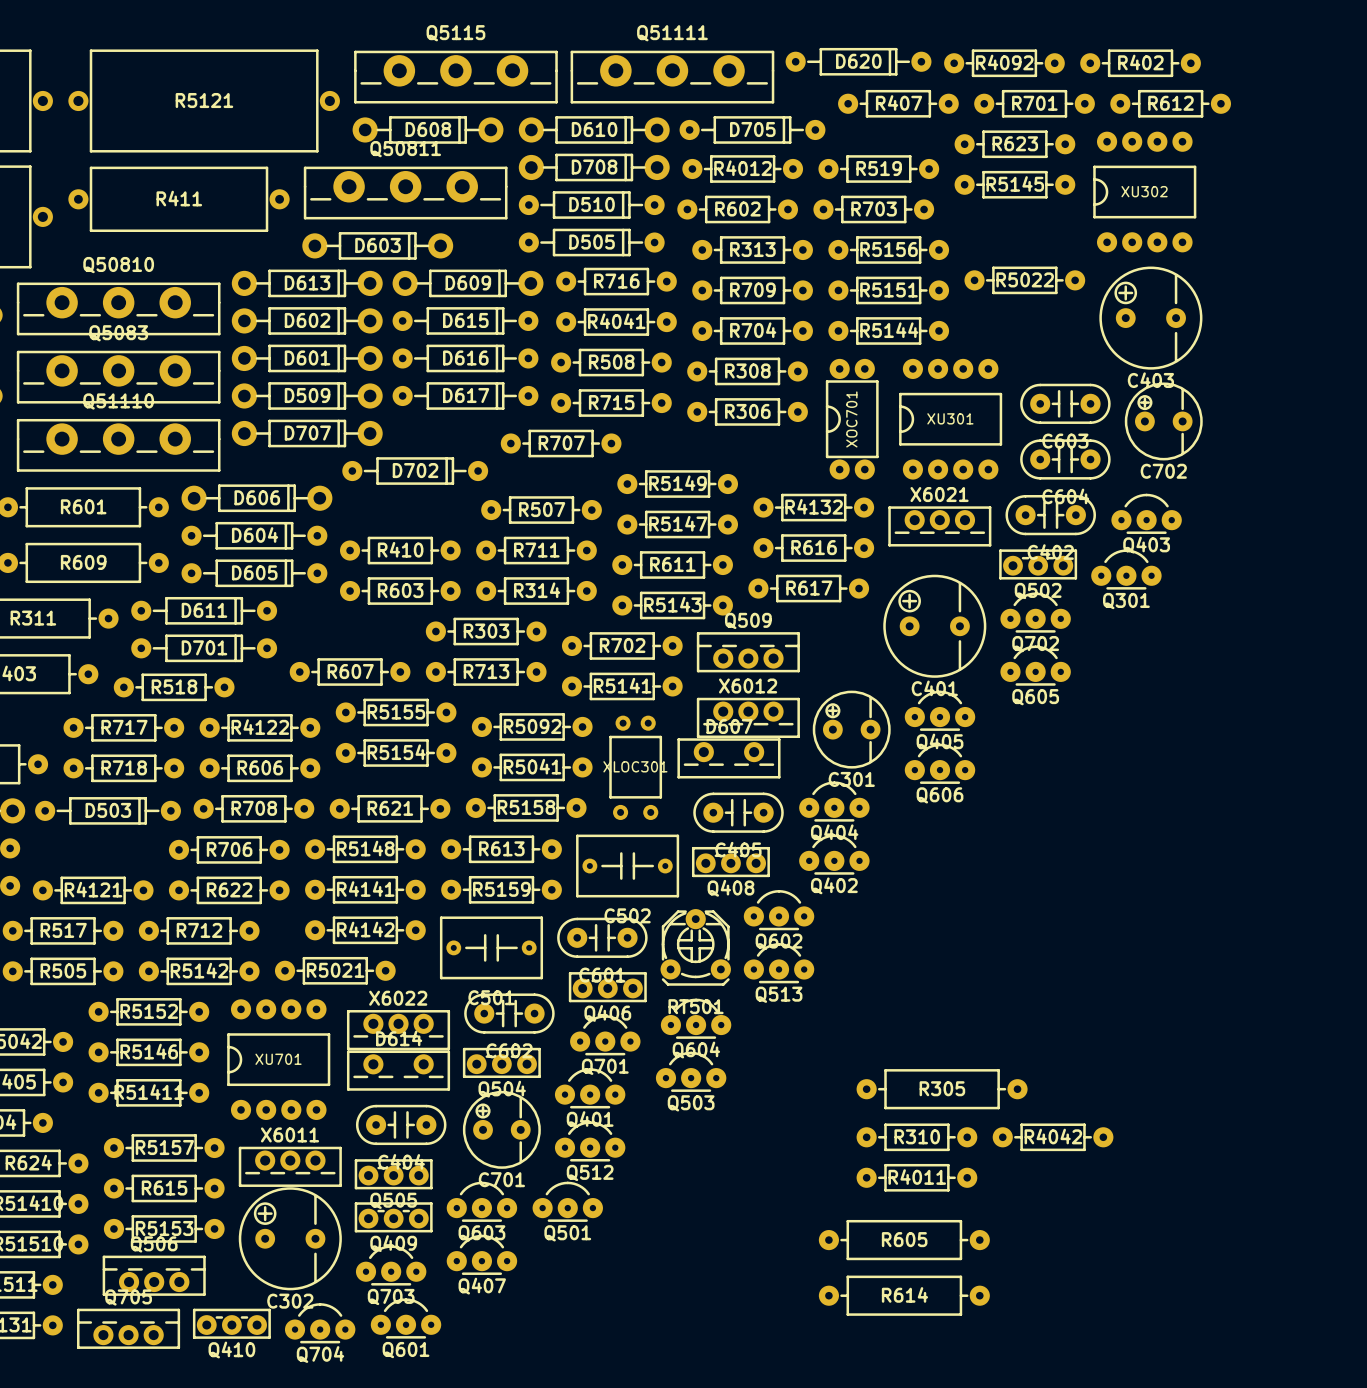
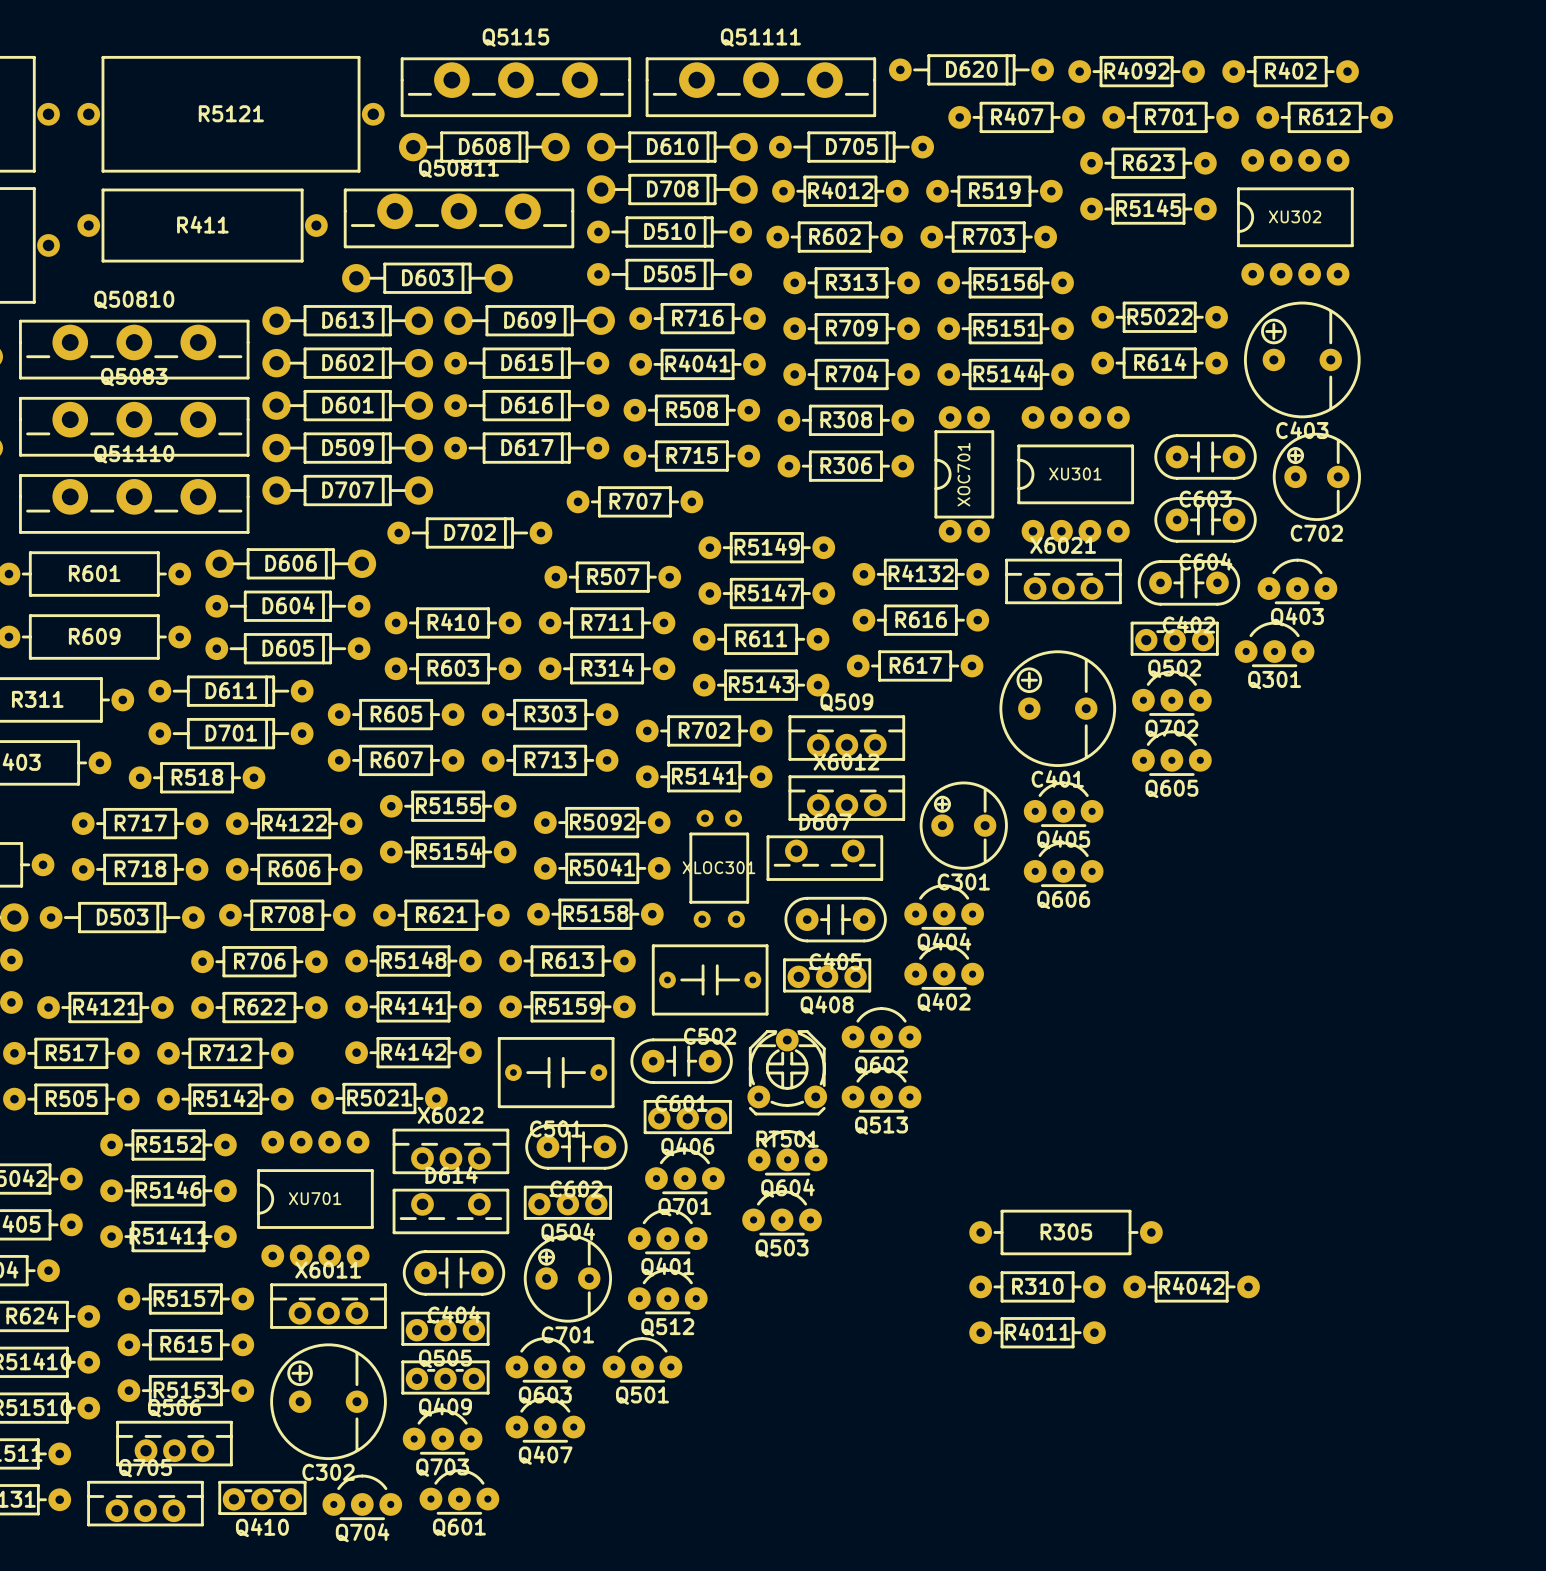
X6021 footprint: [888, 506, 992, 547] -> [1005, 558, 1122, 605]
X6012 footprint: [696, 697, 800, 739] -> [788, 775, 906, 821]
X6022 footprint: [346, 1010, 451, 1051] -> [392, 1128, 510, 1175]
X6011 footprint: [238, 1146, 342, 1187] -> [270, 1283, 387, 1329]
R605 footprint: [818, 1219, 990, 1261] -> [327, 698, 465, 731]
R614 footprint: [818, 1275, 990, 1316] -> [1091, 347, 1228, 379]

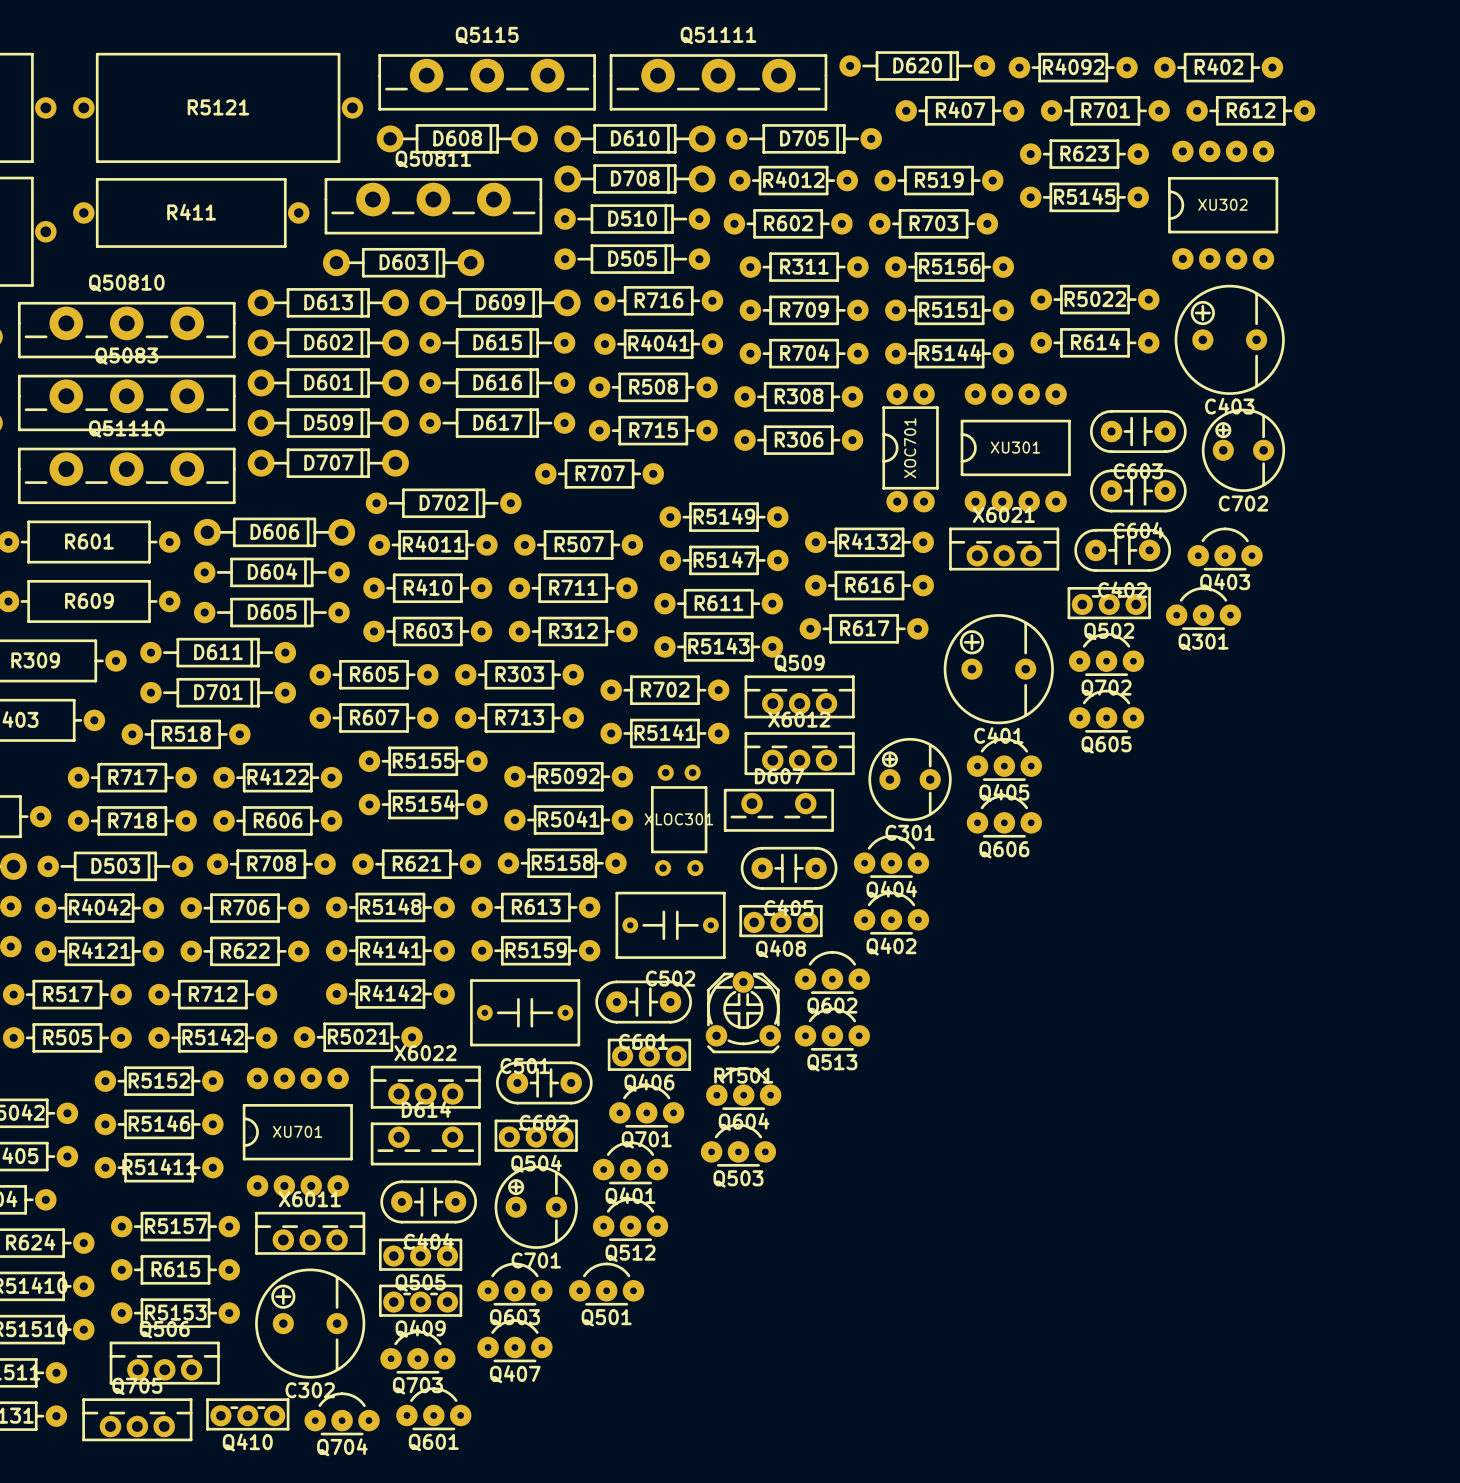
R313 name: R313 (851, 282) -> R311 (804, 266)
R314 name: R314 (607, 667) -> R312 (573, 630)
R311 name: R311 (37, 699) -> R309 (35, 660)
R305: (1066, 1232) -> none
R310: (1037, 1286) -> none
R4042 position: (1191, 1286) -> (99, 908)
R4011 position: (1037, 1332) -> (433, 544)

